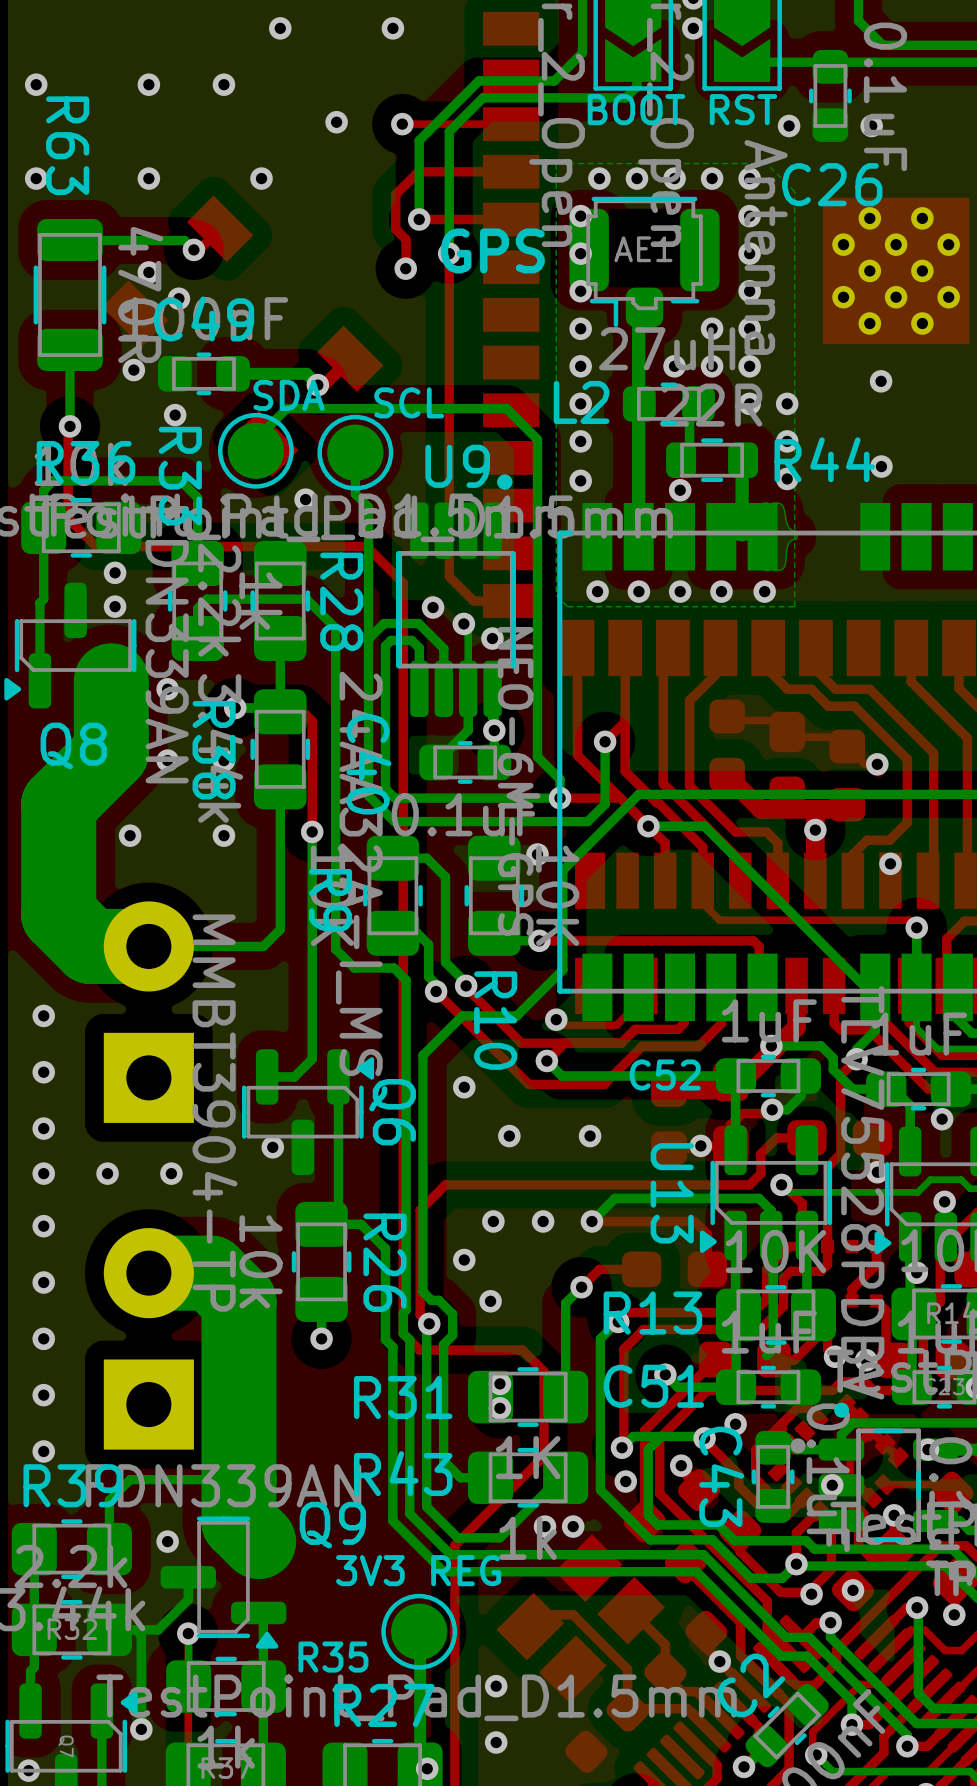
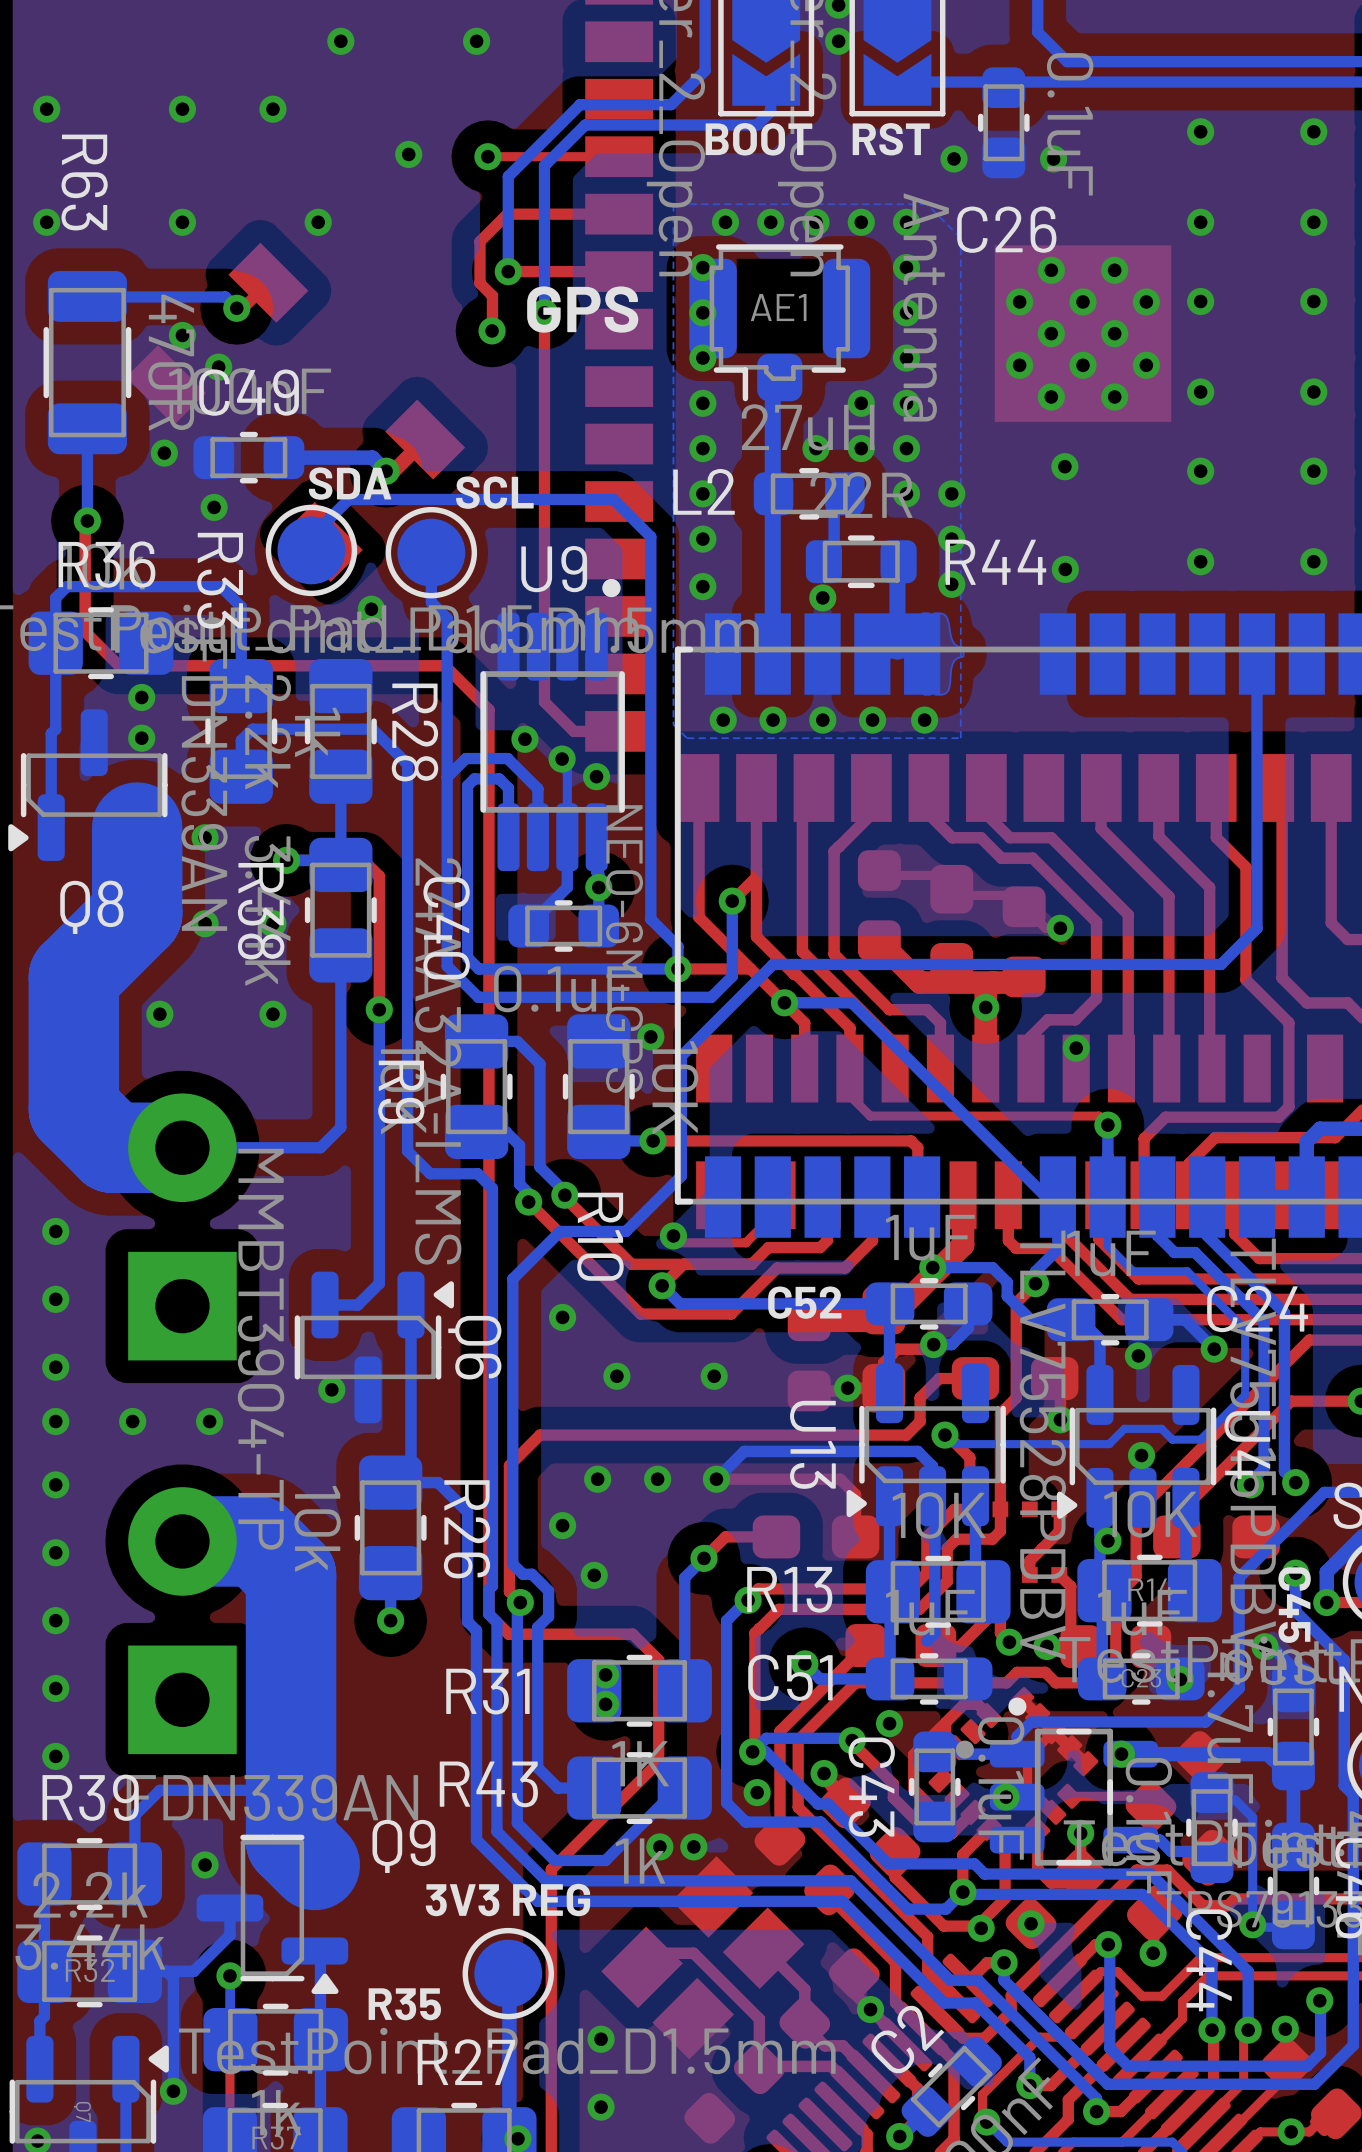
bottom track: (661, 1436) (648, 1449) (648, 1515) (657, 1524) (718, 1524) -> (754, 1751) (765, 1751) (817, 1804) (828, 1804) (869, 1844)
bottom track: (616, 1505) (650, 1539) (712, 1539) -> (745, 1822) (820, 1822) (861, 1862)

